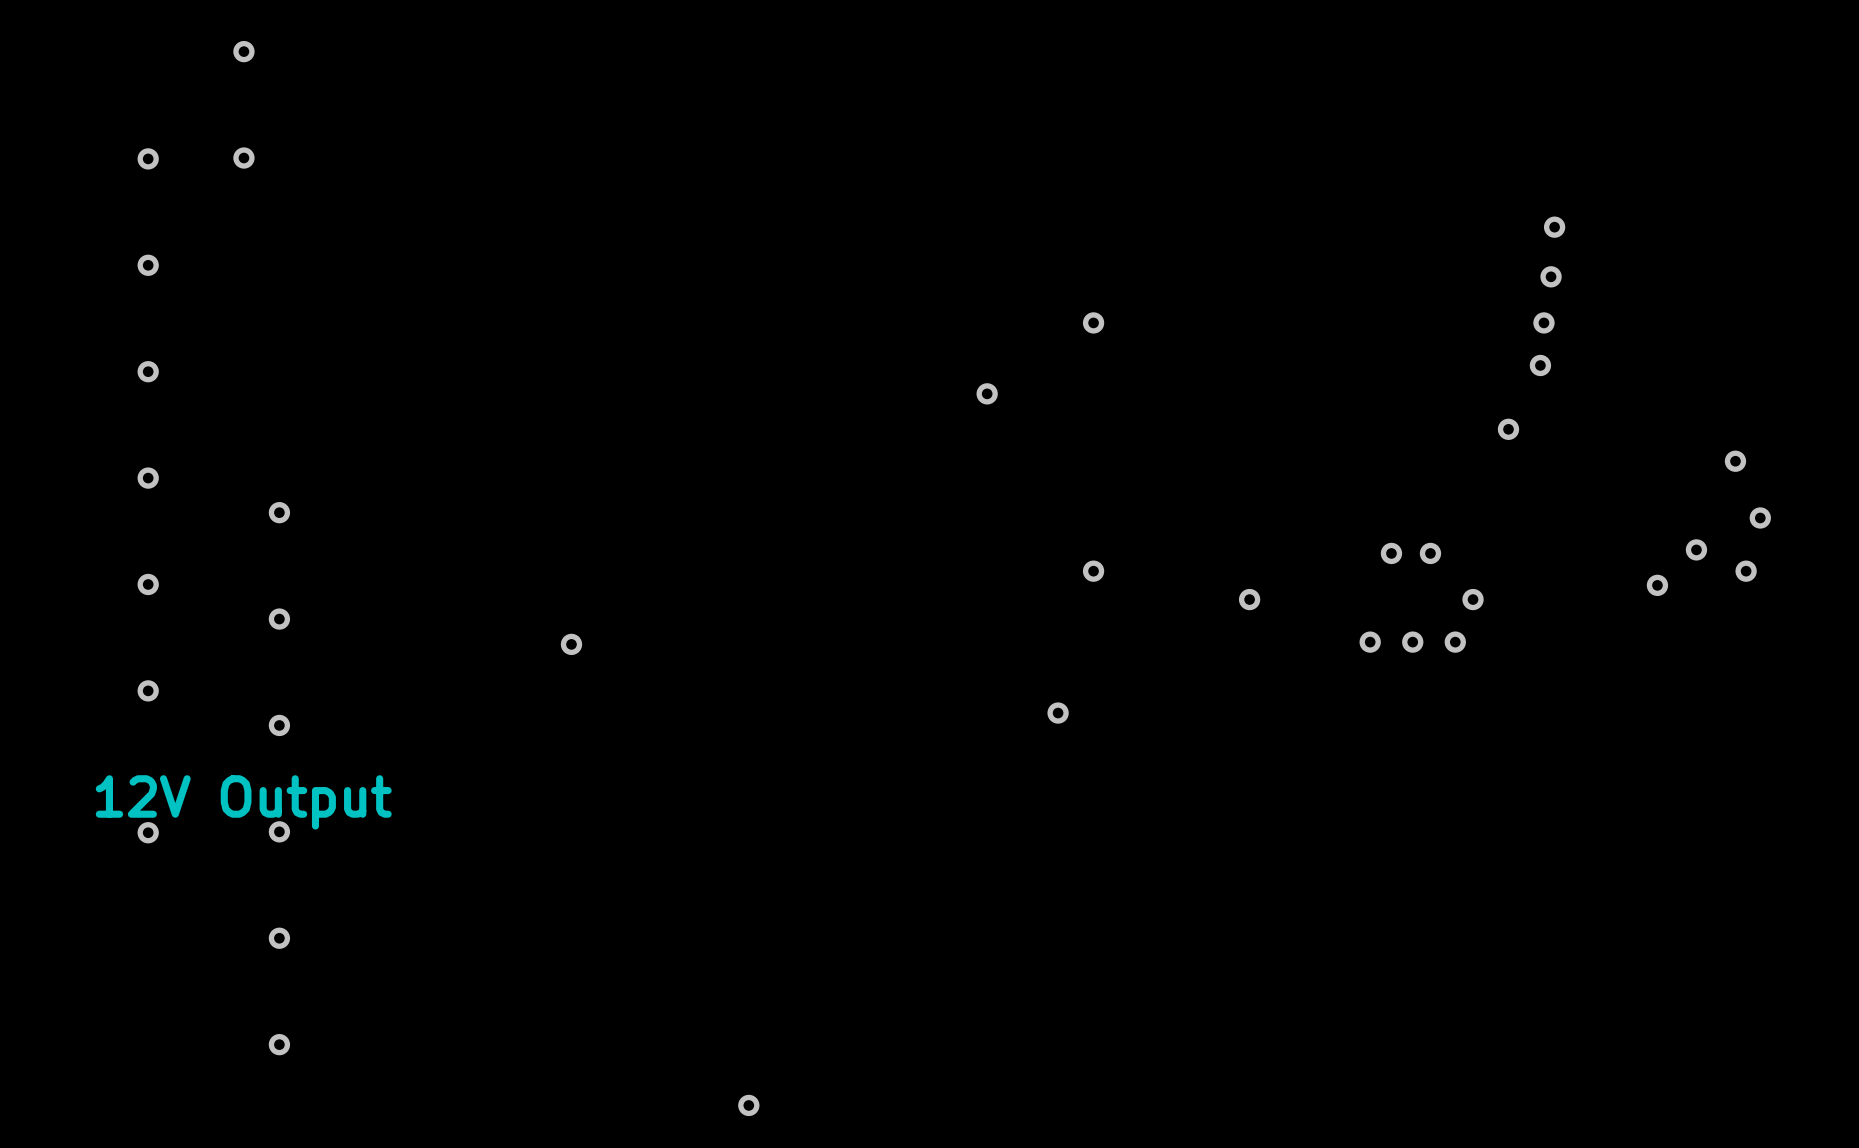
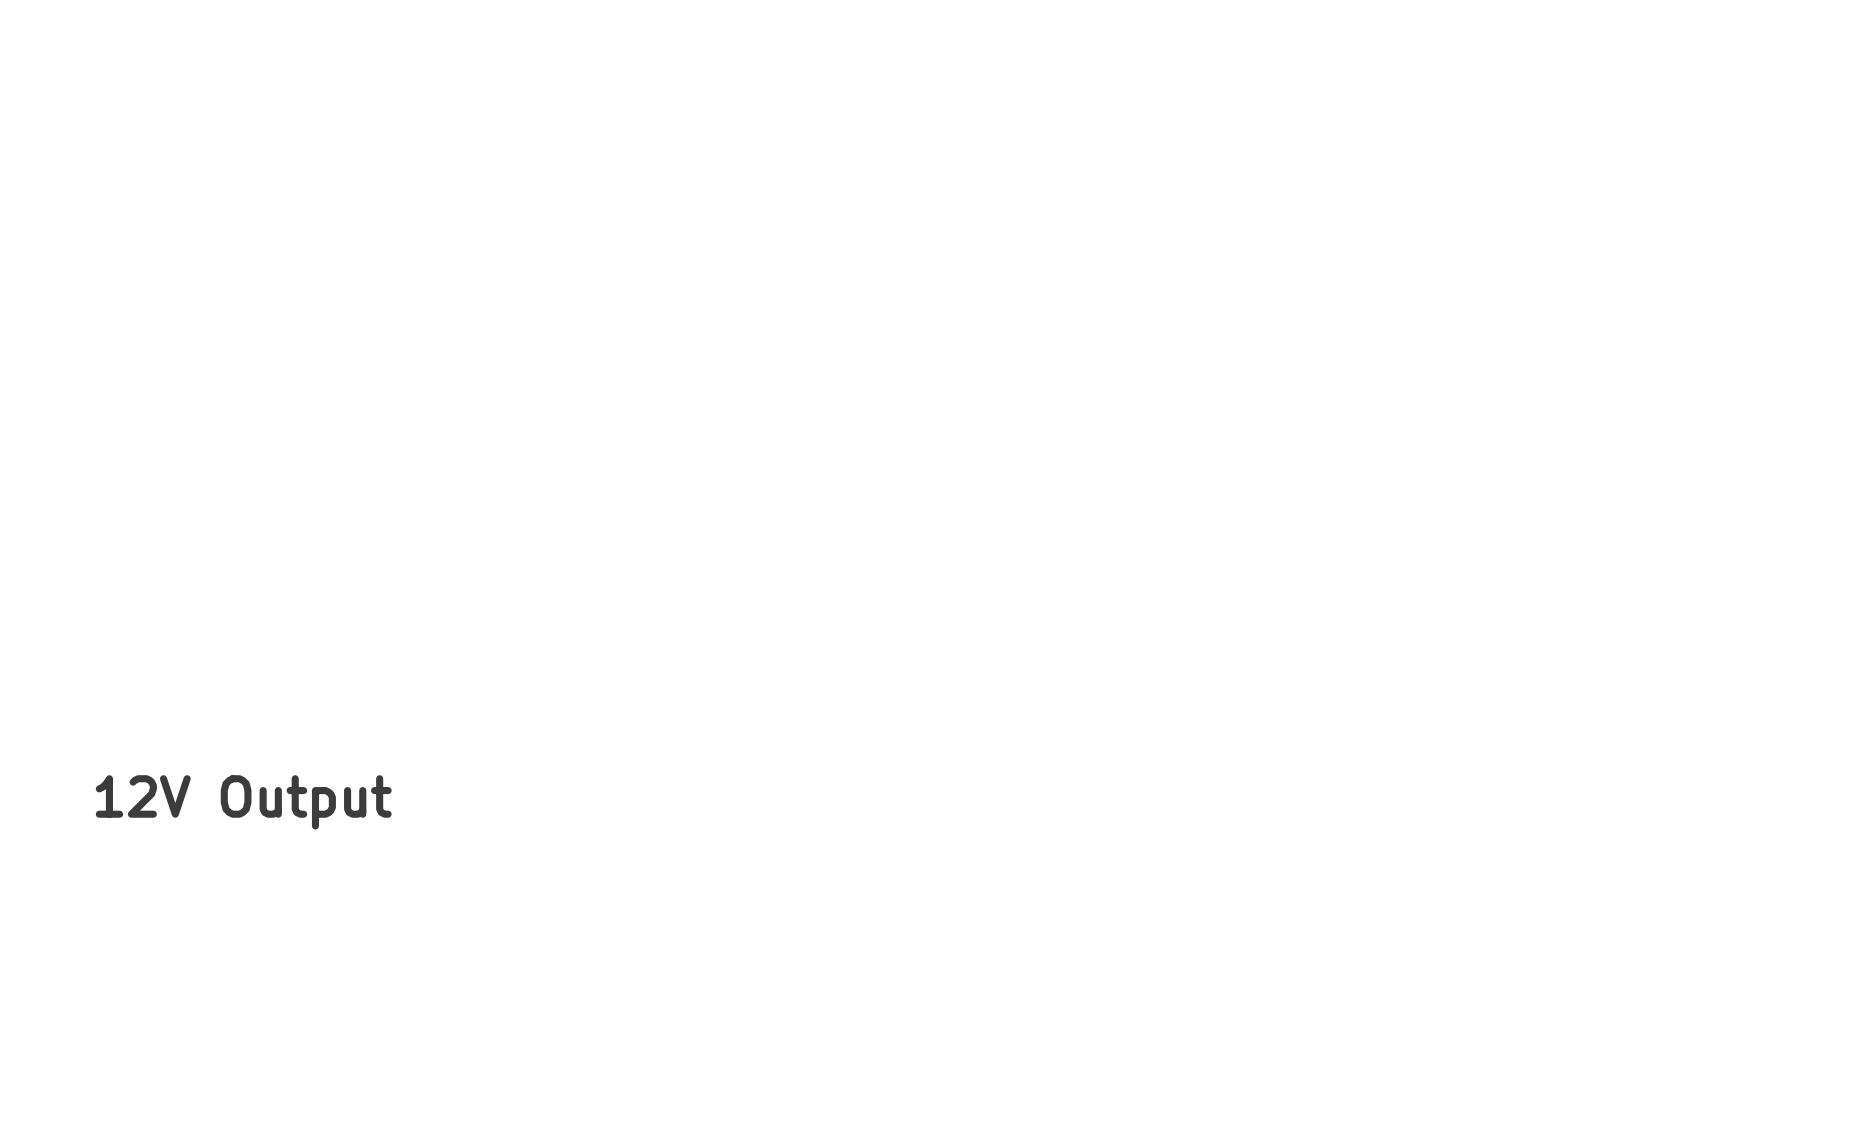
via: (243, 51) -> none
via: (148, 158) -> none
via: (243, 158) -> none
via: (1554, 227) -> none
via: (148, 265) -> none
via: (1551, 276) -> none
via: (1093, 322) -> none
via: (1543, 322) -> none
via: (1540, 365) -> none
via: (148, 371) -> none
via: (987, 393) -> none
via: (1508, 429) -> none
via: (1735, 461) -> none
via: (148, 478) -> none
via: (279, 512) -> none
via: (1760, 517) -> none
via: (1696, 549) -> none
via: (1391, 553) -> none
via: (1430, 553) -> none
via: (1093, 571) -> none
via: (1746, 571) -> none
via: (148, 584) -> none
via: (1657, 585) -> none
via: (1249, 599) -> none
via: (1473, 599) -> none
via: (279, 619) -> none
via: (1370, 642) -> none
via: (1412, 642) -> none
via: (1455, 642) -> none
via: (571, 644) -> none
via: (148, 690) -> none
via: (1058, 713) -> none
via: (279, 725) -> none
via: (279, 831) -> none
via: (148, 832) -> none
via: (279, 938) -> none
via: (279, 1044) -> none
via: (748, 1105) -> none

